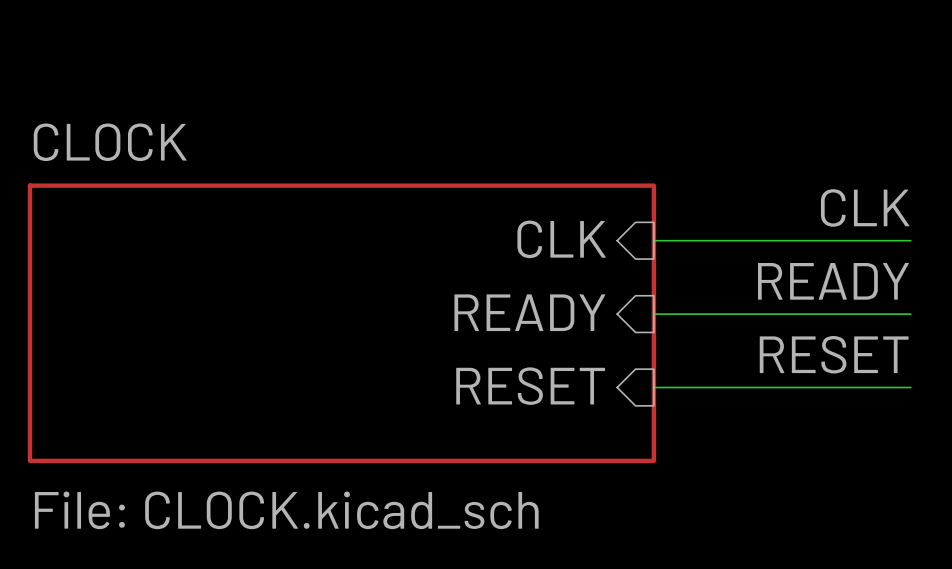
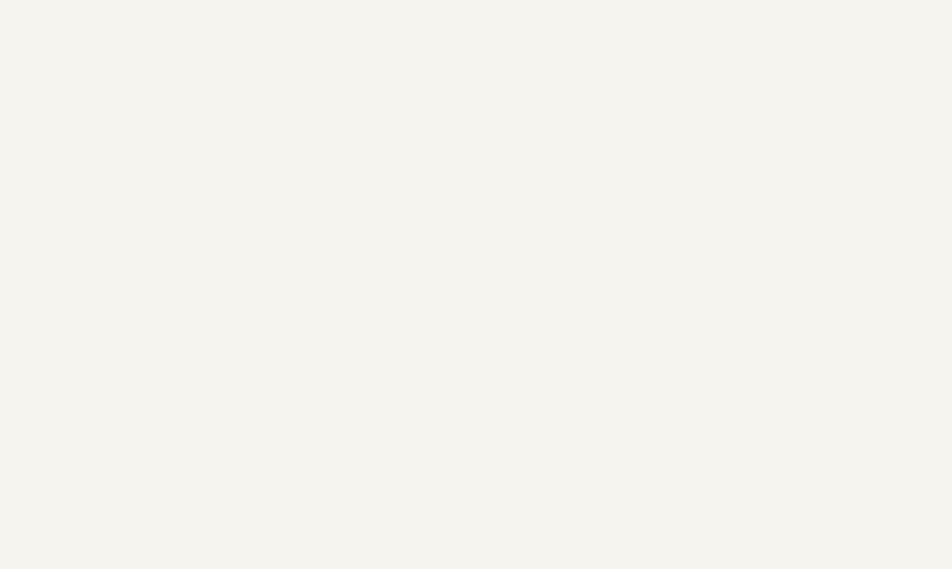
label: CLK (865, 207) -> none
sheet pin: CLK (561, 239) -> none
wire: (653, 240) (910, 240) -> none
label: READY (833, 281) -> none
sheet pin: READY (529, 312) -> none
wire: (653, 314) (910, 314) -> none
sheet CLOCK: File: CLOCK.kicad_sch (341, 323) -> none
label: RESET (834, 354) -> none
sheet pin: RESET (530, 386) -> none
wire: (653, 387) (910, 387) -> none

